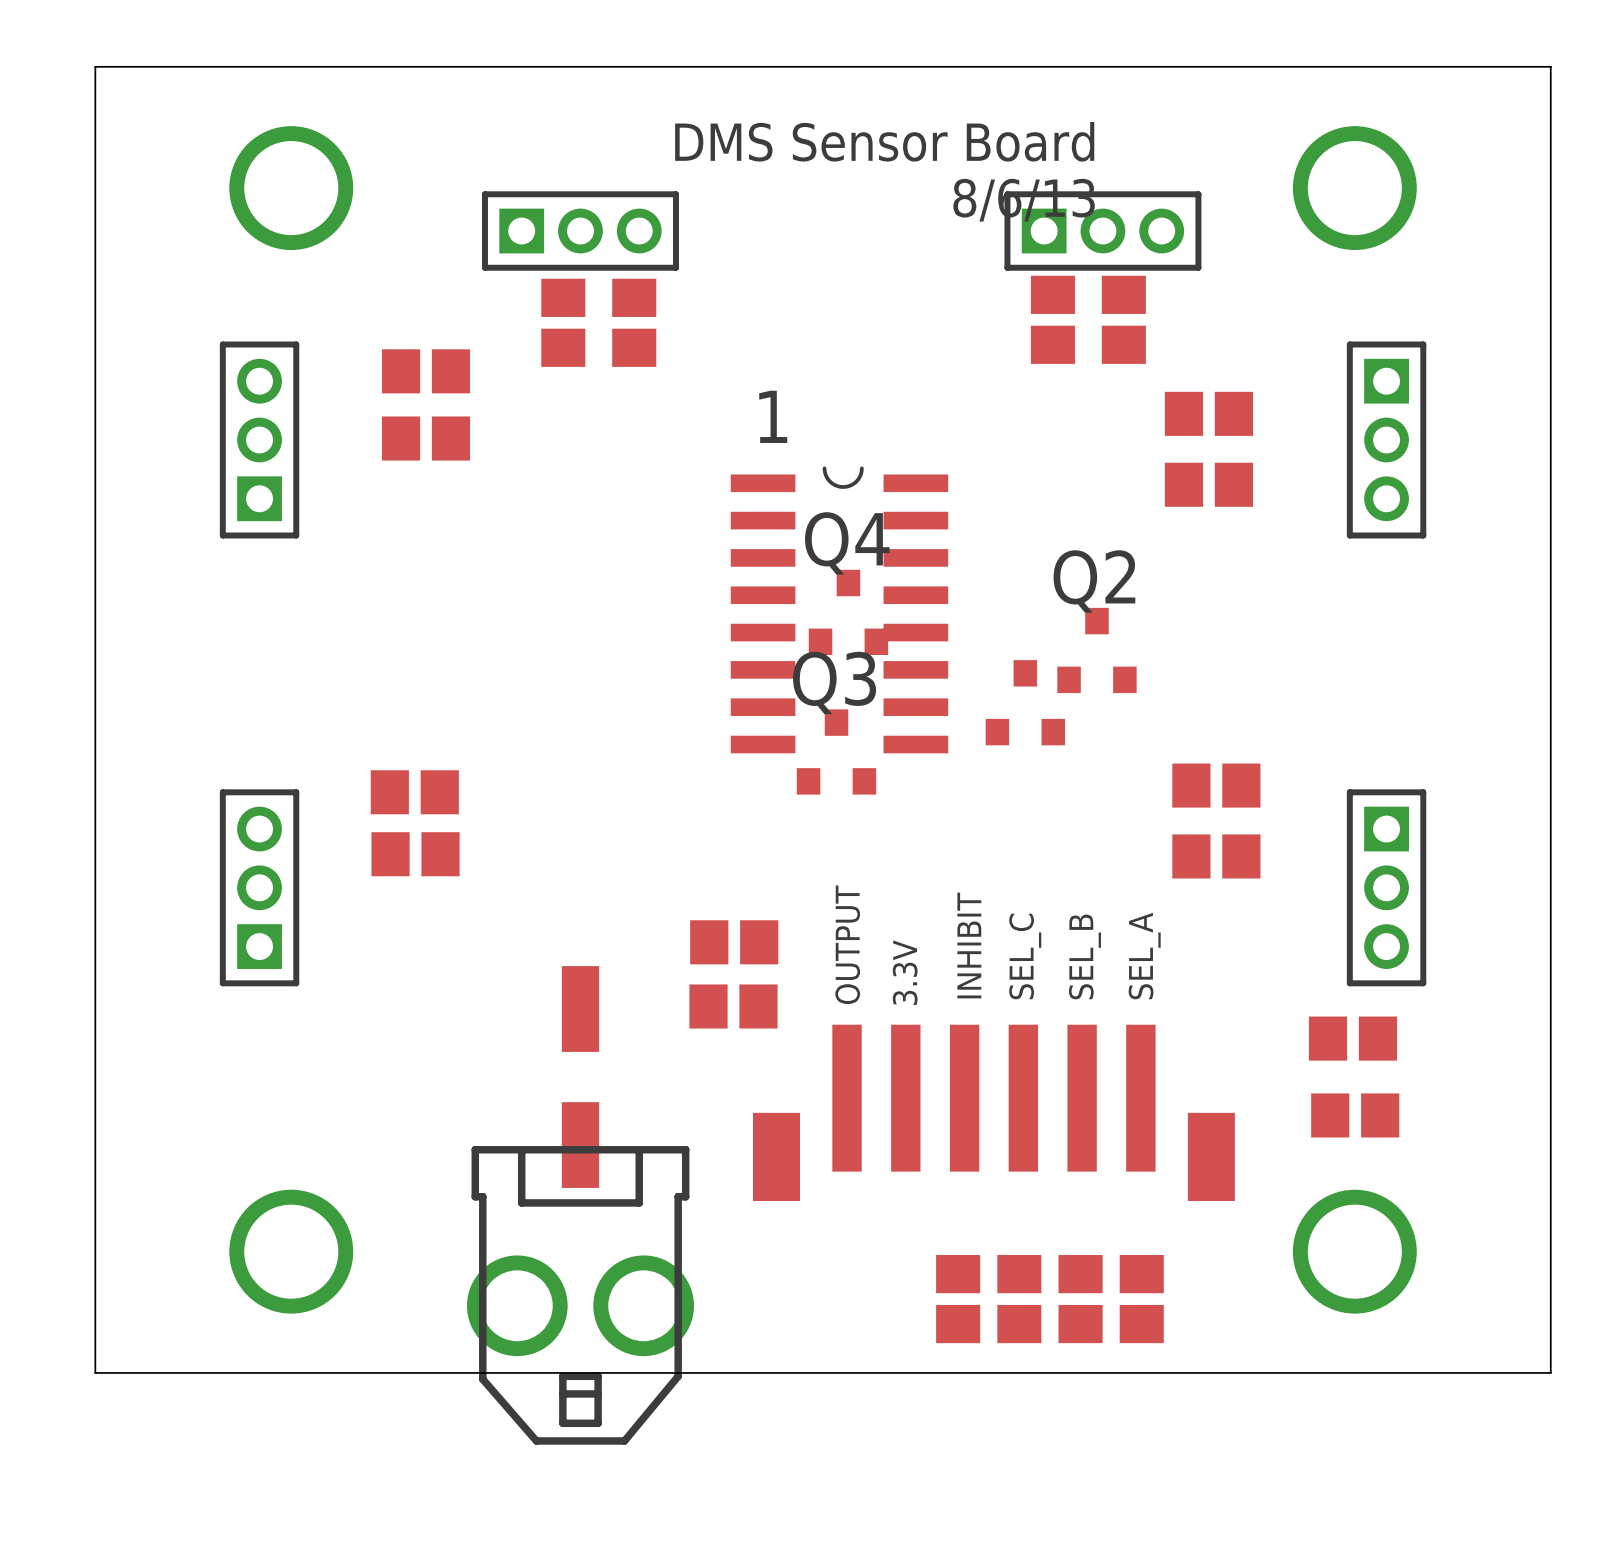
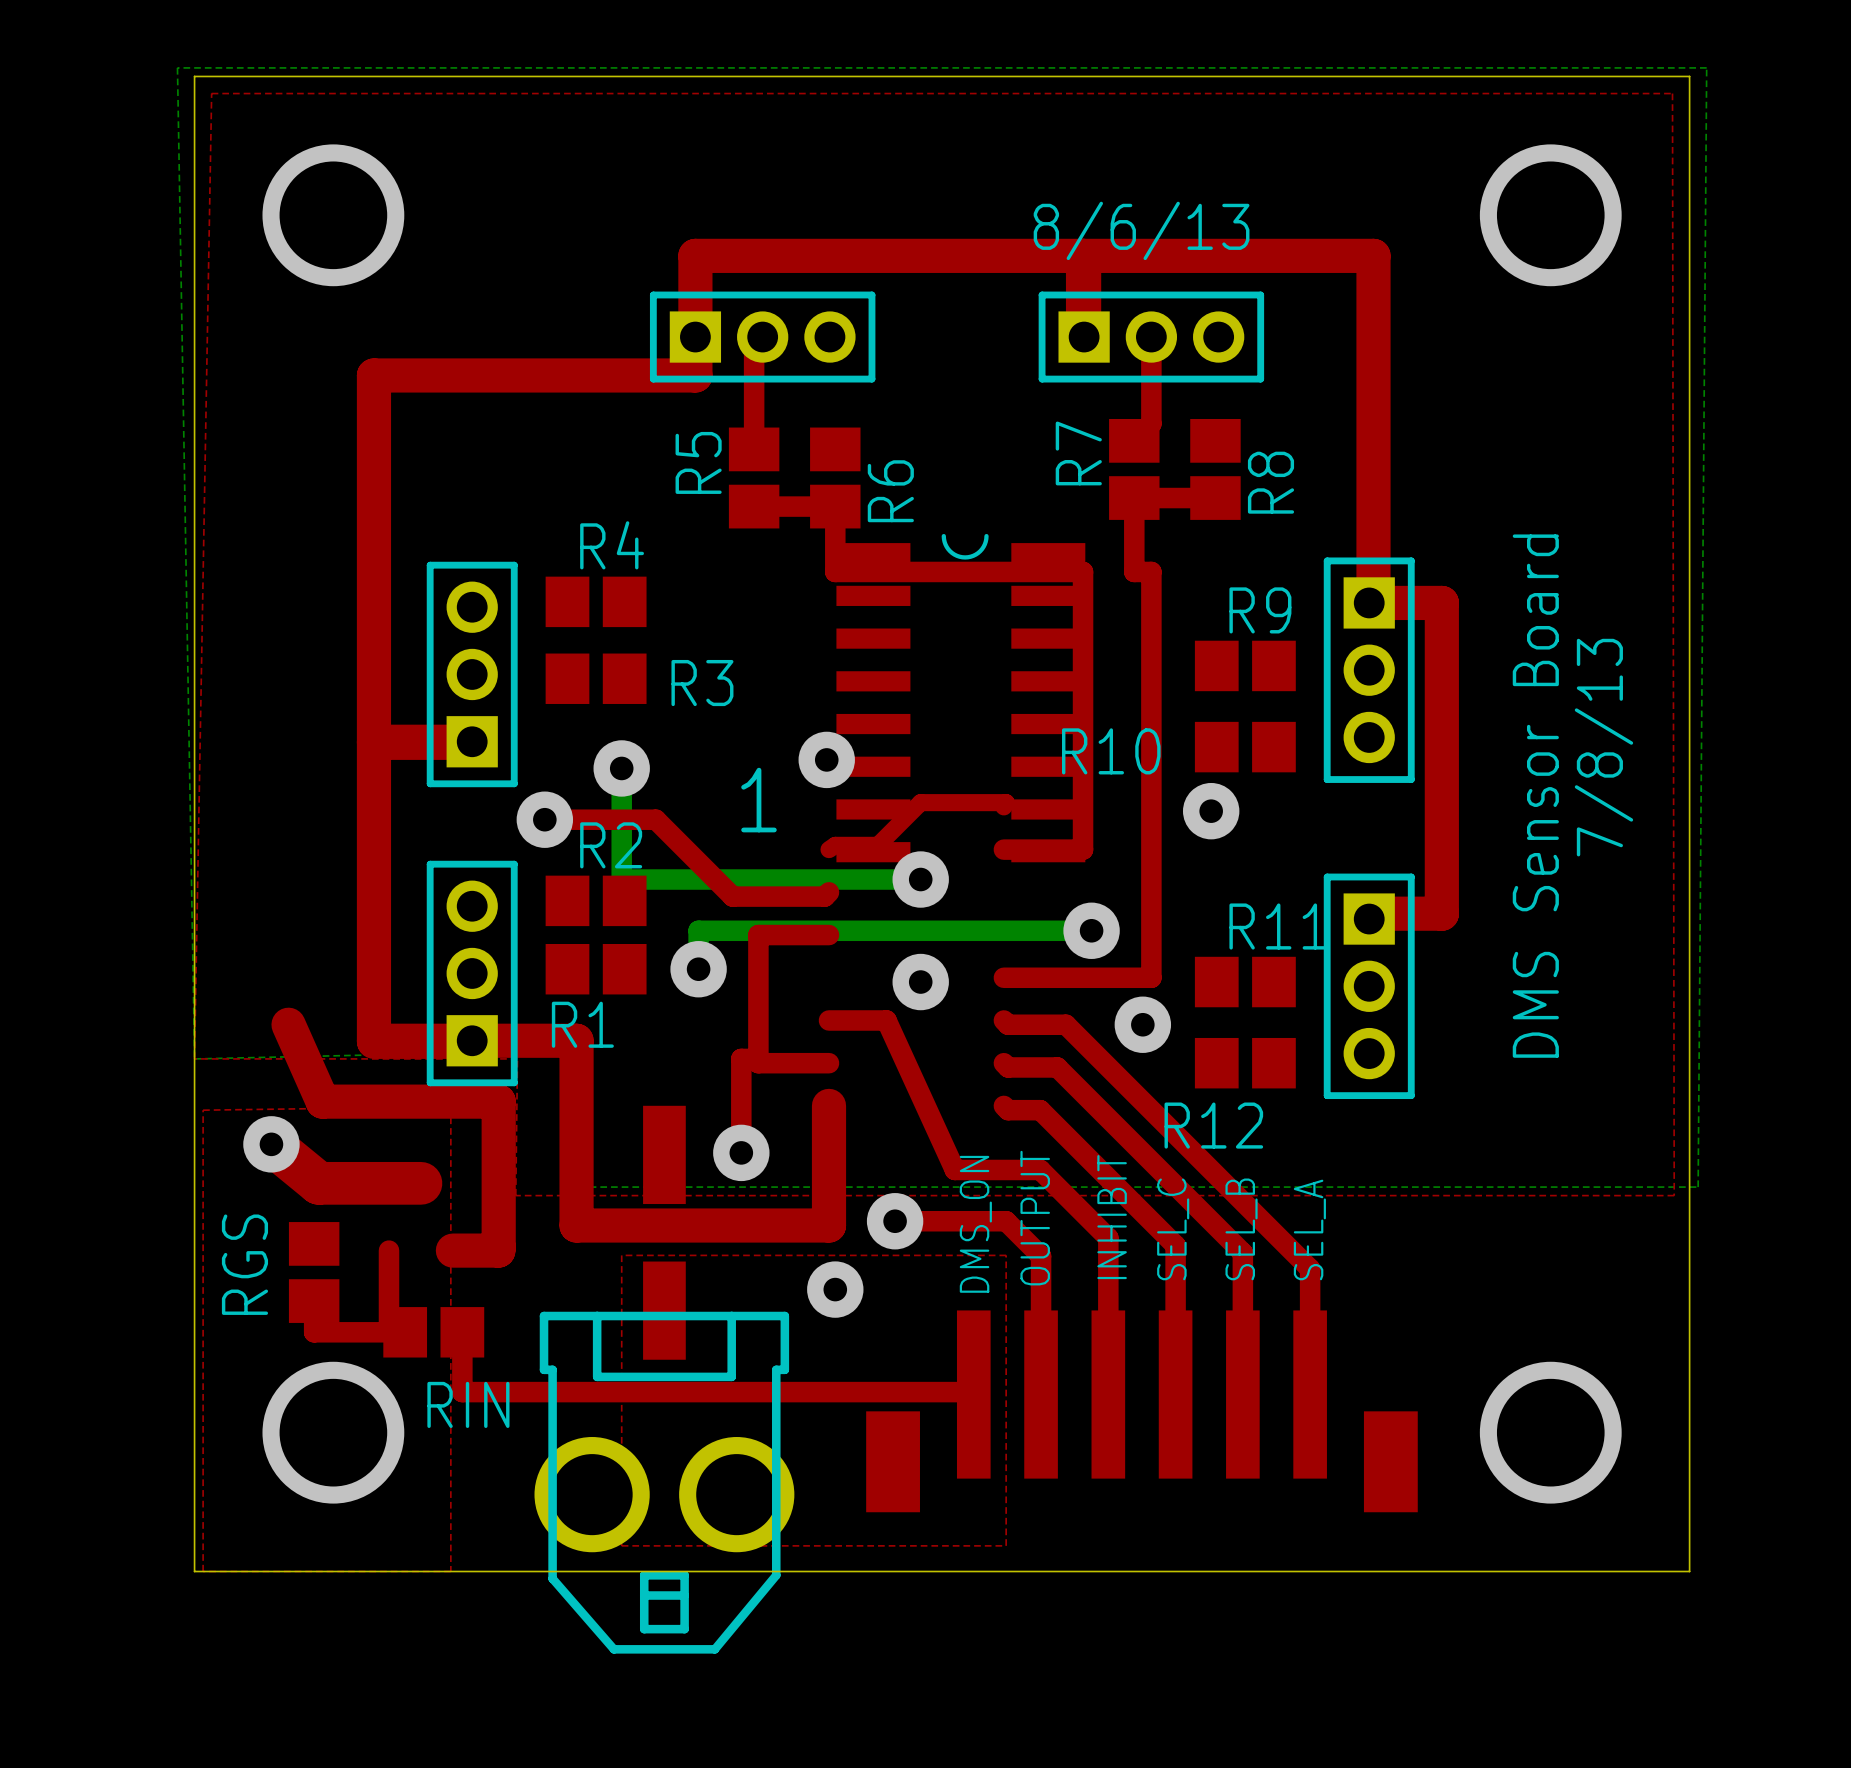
bottom zone outline: none -> (177, 67) (1706, 67) (1698, 1187) (579, 1187) (579, 1050) (194, 1058) (177, 67)
board edge: (169, 66) (95, 66) (95, 1372) (169, 1372) -> (194, 76) (194, 1571)
board edge: (1476, 66) (1550, 66) (1550, 1372) (1476, 1372) -> (1689, 76) (1689, 1571)
top zone outline: none -> (211, 93) (1672, 93) (1674, 1195) (515, 1195) (517, 1058) (194, 1058) (211, 93)
text: DMS Sensor Board (884, 141) -> none
part position: (580, 231) -> (762, 337)
part position: (1102, 231) -> (1151, 337)
top track: none -> (762, 337) (754, 337) (754, 449)
top track: none -> (1151, 337) (1151, 423) (1134, 440)
part: (1052, 319) -> none
part: (1123, 319) -> none
part: (563, 322) -> none
part: (634, 322) -> none
part: (425, 371) -> none
R7: none -> (1134, 469)
R8: none -> (1215, 469)
part: (1208, 413) -> none
text position: 1 (773, 416) -> 1 (758, 800)
R5: none -> (754, 477)
R6: none -> (835, 477)
top track: none -> (1215, 498) (1134, 498) (1134, 571) (1151, 571) (1151, 977) (1003, 977)
part: (425, 438) -> none
part: (259, 439) -> none
part: (1386, 439) -> none
top track: none -> (754, 506) (835, 506) (835, 571) (1083, 571) (1083, 849) (1003, 849)
part: (1208, 484) -> none
R4: none -> (596, 601)
top track: none -> (1369, 602) (1441, 602) (1441, 913) (1369, 913) (1369, 919)
top track: none -> (1373, 602) (1373, 255) (1084, 255) (1084, 337) (1083, 255) (695, 255) (695, 375) (373, 375) (373, 741) (472, 741) (373, 742) (373, 1040) (576, 1040) (576, 1225) (829, 1225) (829, 1105)
R9: none -> (1245, 665)
part: none -> (1369, 670)
part: none -> (472, 674)
R3: none -> (596, 678)
Q4: (848, 612) -> none
Q2: (1096, 650) -> none
R10: none -> (1245, 747)
via: none -> (826, 759)
bottom track: none -> (621, 768) (621, 879) (920, 879)
via: none -> (621, 768)
part: (1025, 702) -> none
top track: none -> (1003, 806) (1006, 802) (920, 802) (878, 845) (835, 845) (829, 849)
via: none -> (1211, 811)
top track: none -> (544, 819) (655, 819) (732, 896) (824, 896) (829, 892)
via: none -> (544, 819)
text: none -> DMS Sensor Board (1535, 796)
Q3: (836, 751) -> none
text: none -> 7/8/13 (1603, 747)
via: none -> (920, 879)
part: (1216, 785) -> none
R2: none -> (596, 900)
part: (414, 792) -> none
bottom track: none -> (1091, 930) (698, 930) (698, 969)
via: none -> (1091, 930)
top track: none -> (829, 935) (758, 935) (758, 1063) (829, 1063)
part footprint: [371, 832, 460, 877] -> [426, 860, 518, 1087]
part footprint: [1172, 834, 1261, 879] -> [1323, 873, 1415, 1100]
R1: none -> (596, 969)
via: none -> (698, 969)
via: none -> (920, 982)
R11: none -> (1245, 982)
part: (259, 887) -> none
part: (1386, 887) -> none
top track: none -> (829, 1020) (886, 1020) (954, 1169) (1040, 1169) (1108, 1237) (1108, 1394)
top track: none -> (1003, 1020) (1008, 1024) (1065, 1024) (1310, 1268) (1310, 1394)
top track: none -> (288, 1024) (322, 1101) (498, 1101) (498, 1250) (452, 1250)
via: none -> (1142, 1024)
top track: none -> (758, 1058) (741, 1058) (741, 1152)
top track: none -> (1003, 1063) (1008, 1067) (1057, 1067) (1242, 1252) (1242, 1394)
R12: none -> (1245, 1063)
part: (734, 942) -> none
text position: OUTPUT (847, 944) -> OUTPUT (1035, 1218)
text position: INHIBIT (969, 945) -> INHIBIT (1112, 1217)
text position: SEL_C (1025, 956) -> SEL_C (1173, 1229)
text position: SEL_B (1084, 956) -> SEL_B (1241, 1229)
text position: SEL_A (1144, 956) -> SEL_A (1309, 1229)
top zone outline: none -> (450, 1106) (203, 1110) (203, 1571) (450, 1571) (450, 1106)
top track: none -> (1003, 1105) (1008, 1110) (1040, 1110) (1175, 1245) (1175, 1394)
text: 3.3V (905, 972) -> none
top track: none -> (271, 1144) (318, 1183) (420, 1183)
via: none -> (271, 1144)
part: (733, 1006) -> none
via: none -> (741, 1152)
part: (1352, 1038) -> none
top track: none -> (895, 1221) (1006, 1221) (1041, 1256) (1041, 1394)
via: none -> (895, 1221)
text: none -> DMS_ON (975, 1224)
top track: none -> (389, 1250) (389, 1332)
top zone outline: none -> (621, 1255) (1006, 1255) (1006, 1545) (621, 1545) (621, 1255)
RGS: none -> (314, 1272)
part position: (993, 1112) -> (1141, 1411)
part: (1355, 1115) -> none
via: none -> (835, 1289)
top track: none -> (314, 1301) (314, 1332) (405, 1332)
RIN: none -> (433, 1332)
top track: none -> (462, 1332) (462, 1392) (973, 1392) (973, 1394)
part: (958, 1299) -> none
part: (1019, 1299) -> none
part: (1080, 1299) -> none
part: (1141, 1299) -> none

